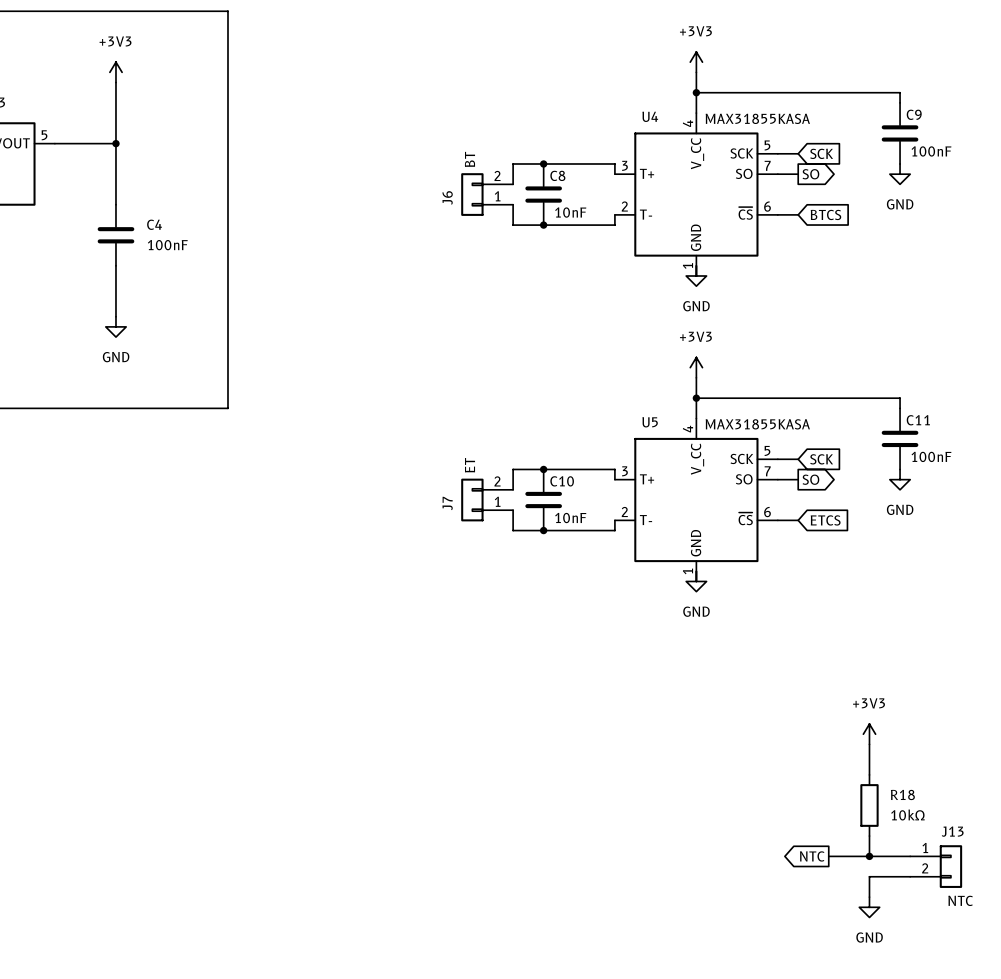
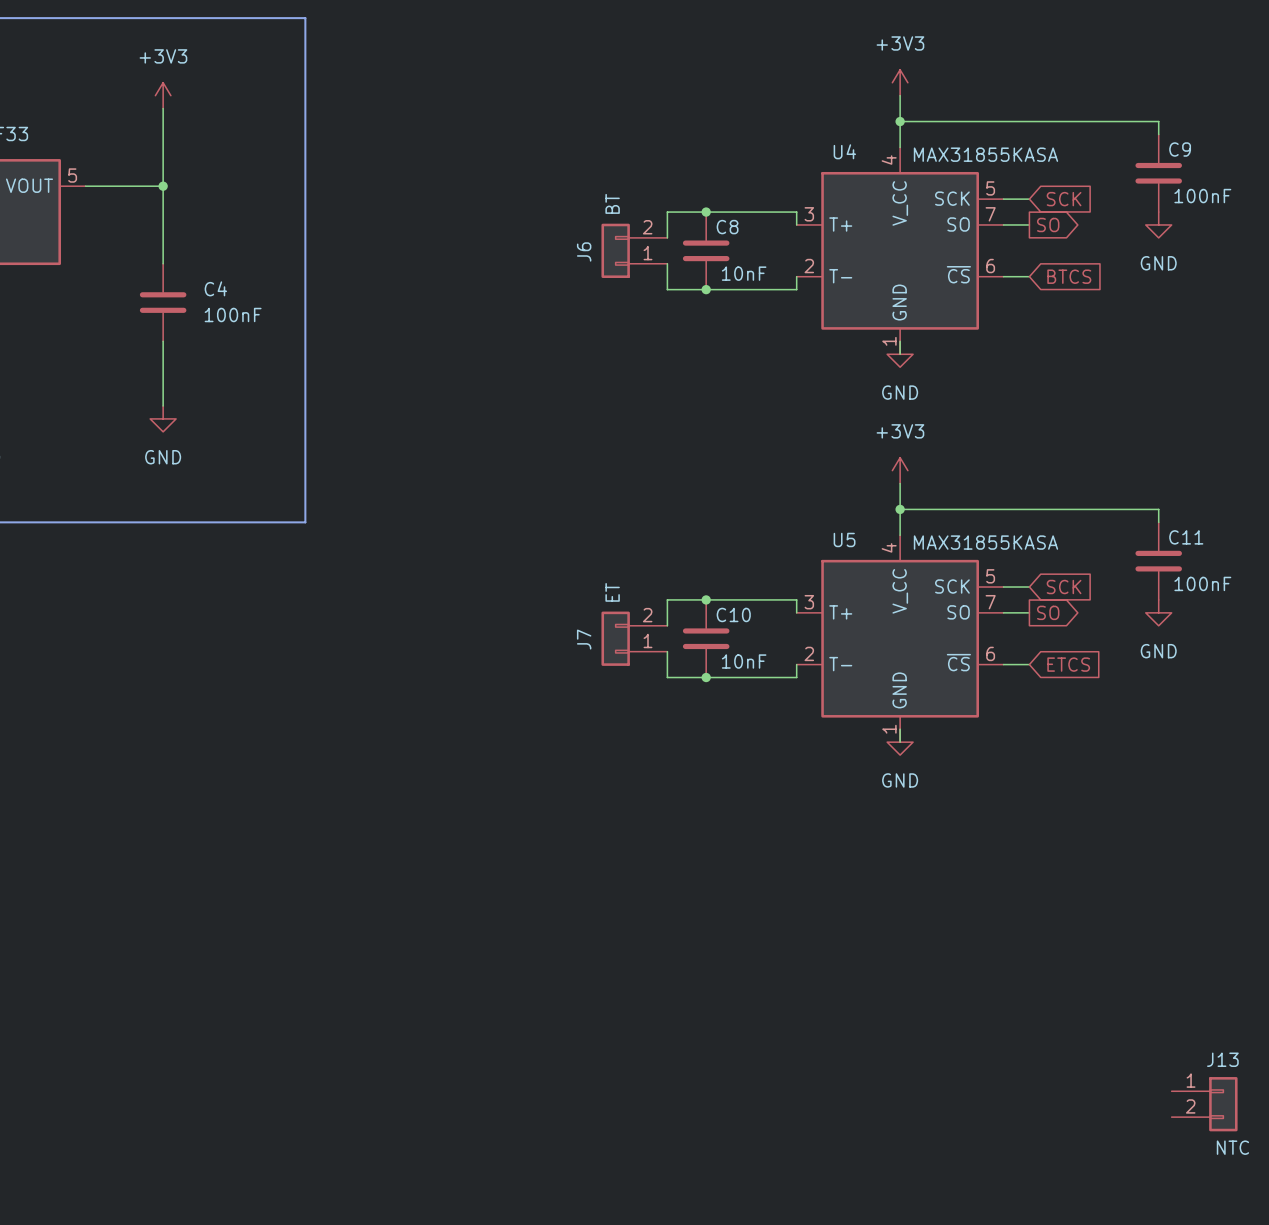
power symbol: +3V3 (869, 734) -> none
wire: (869, 744) (869, 774) -> none
R18: 10kΩ (869, 805) -> none
wire: (869, 836) (869, 856) -> none
global label: NTC (812, 856) -> none
wire: (828, 856) (910, 856) -> none
junction: (869, 856) -> none
wire: (910, 876) (869, 876) (869, 897) -> none
power symbol: GND (869, 907) -> none

